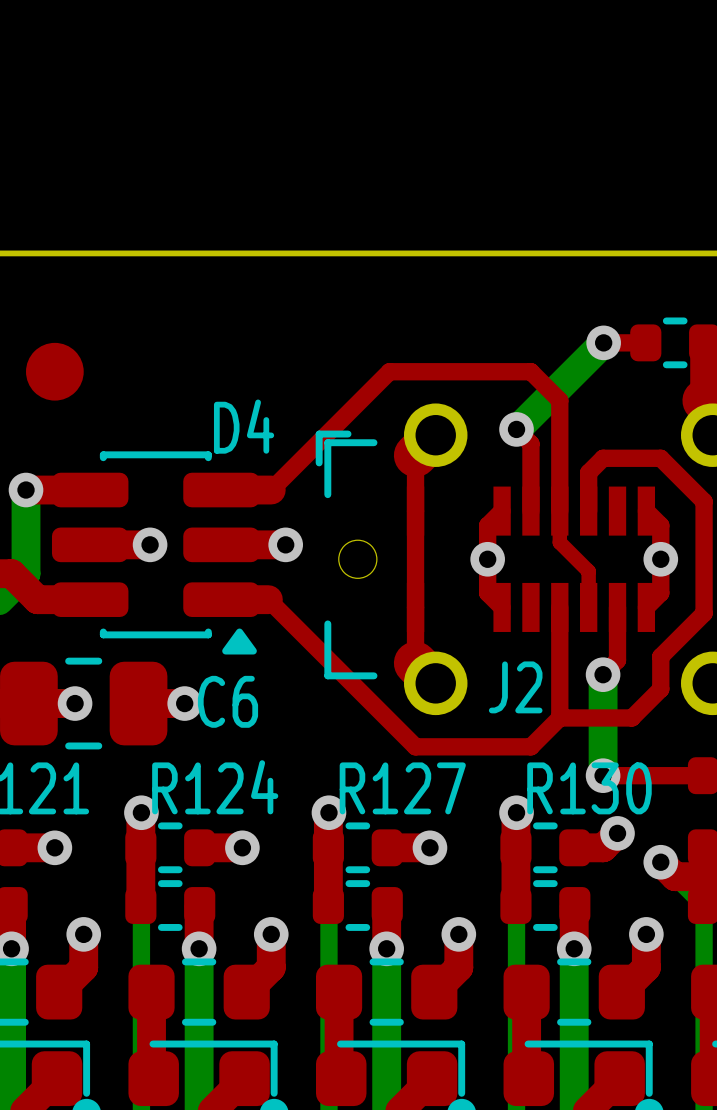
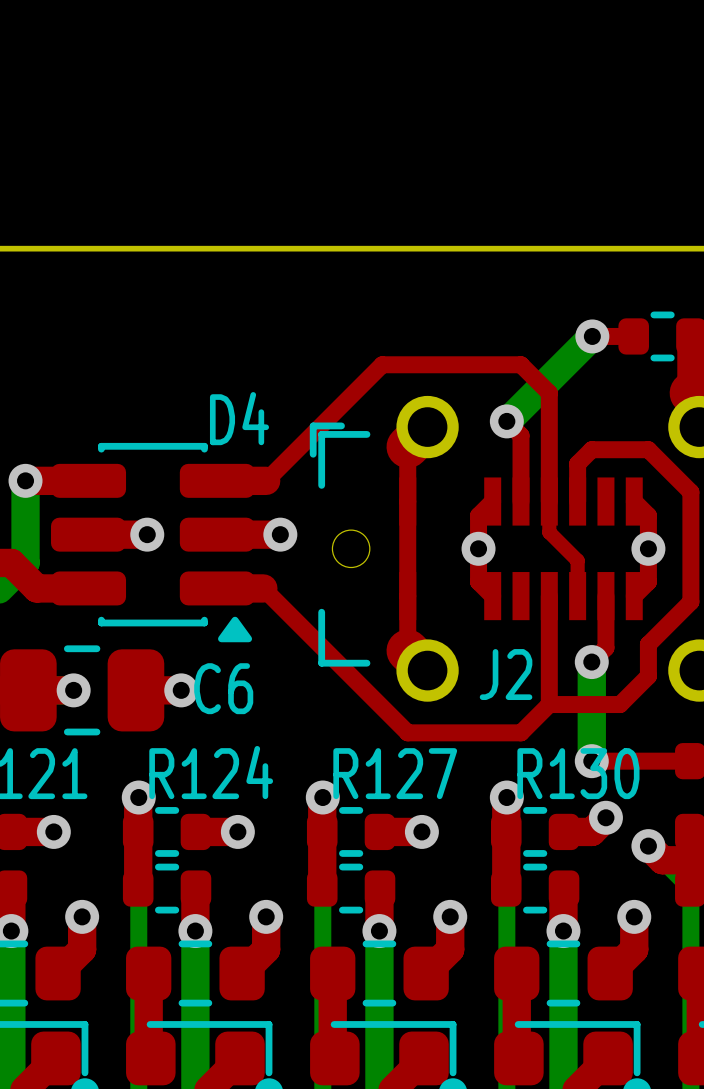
part: (54, 371) -> none

